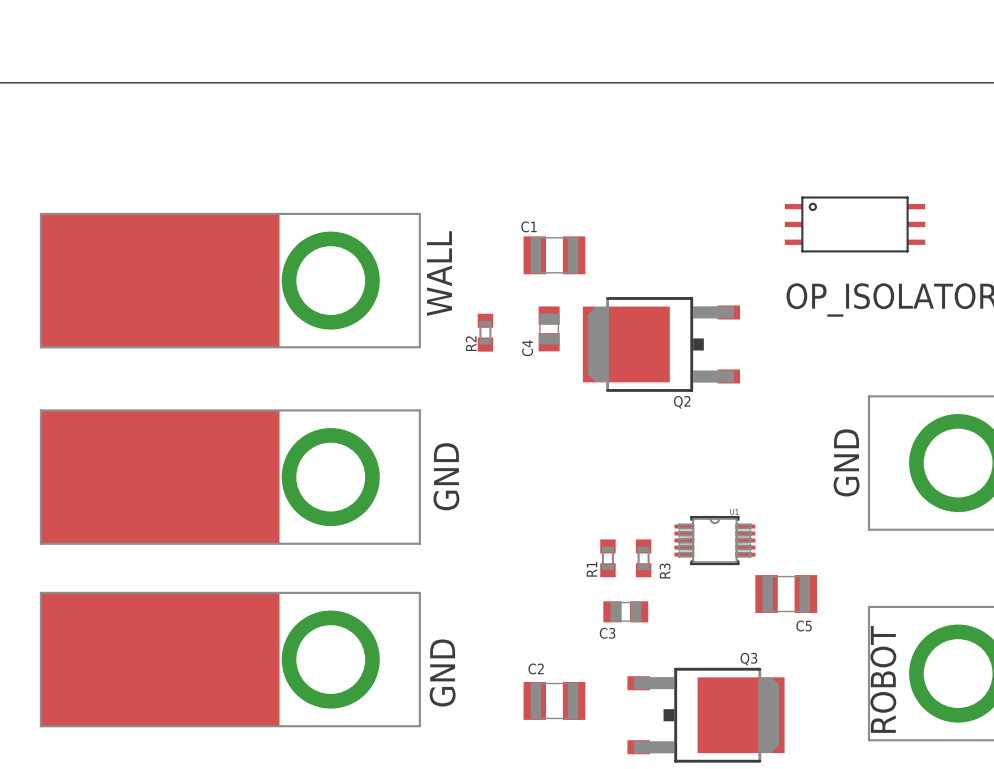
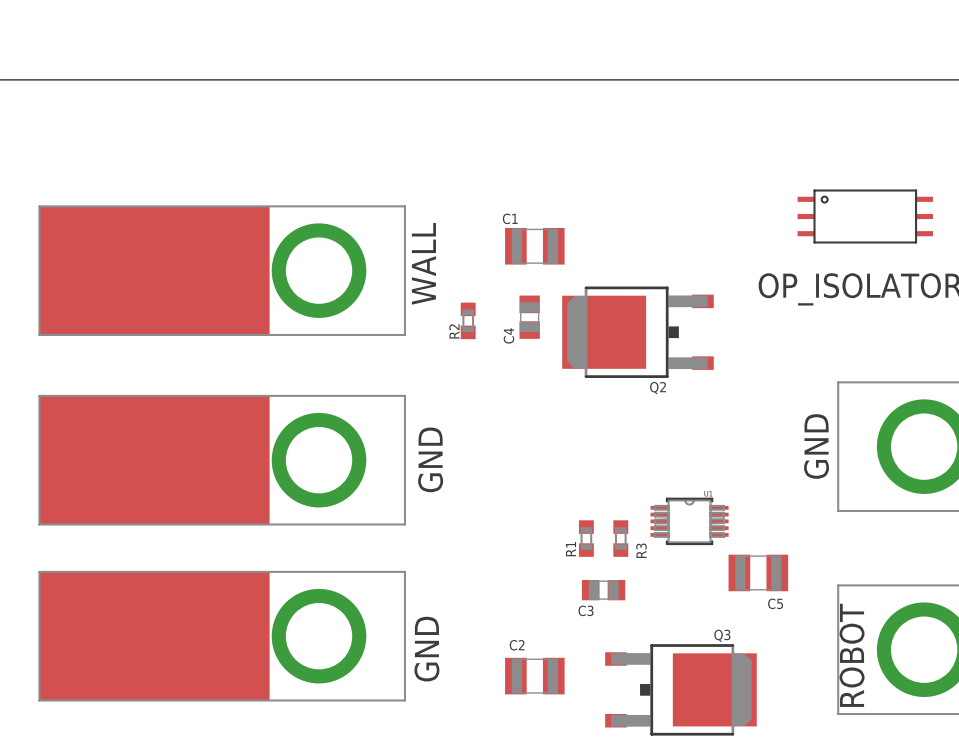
part position: (854, 224) -> (865, 216)

